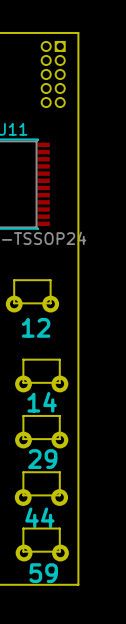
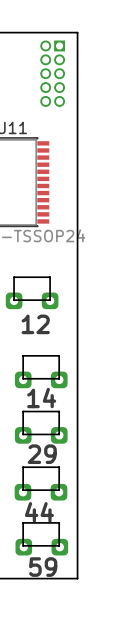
part footprint: [5, 295, 60, 313] -> [5, 292, 59, 310]
part footprint: [15, 375, 69, 393] -> [14, 371, 68, 389]
part footprint: [15, 431, 69, 449] -> [14, 427, 68, 444]
part footprint: [14, 489, 69, 506] -> [14, 483, 68, 501]
part footprint: [15, 544, 69, 562] -> [15, 538, 69, 556]

